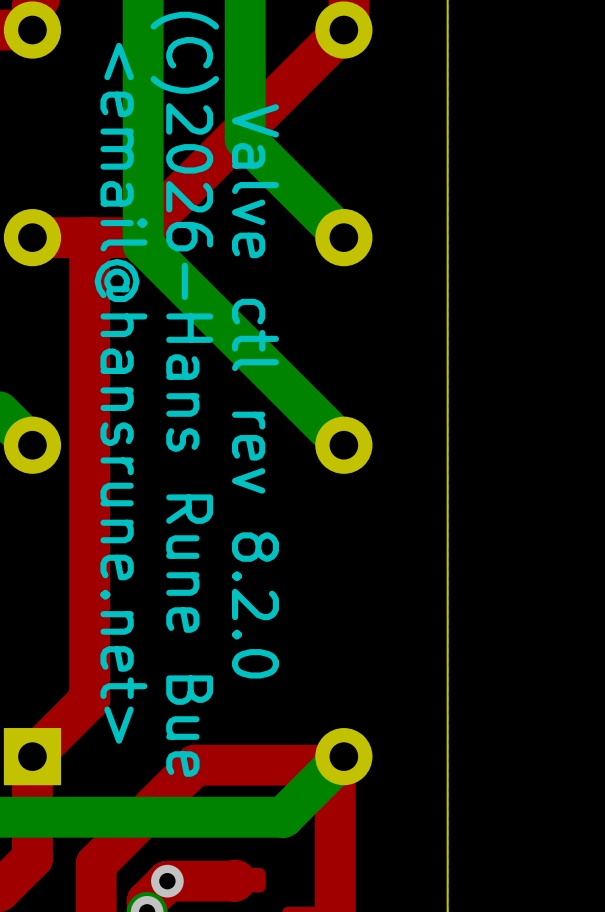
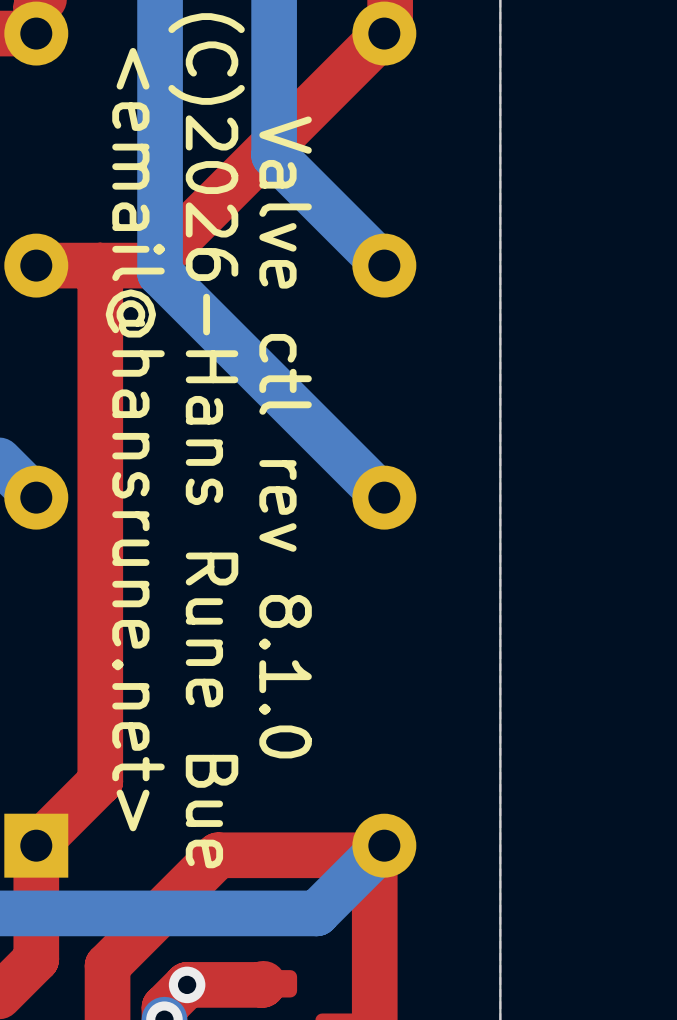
text: Valve ctl rev 8.2.0 (255, 391) -> Valve ctl rev 8.1.0 (285, 437)

